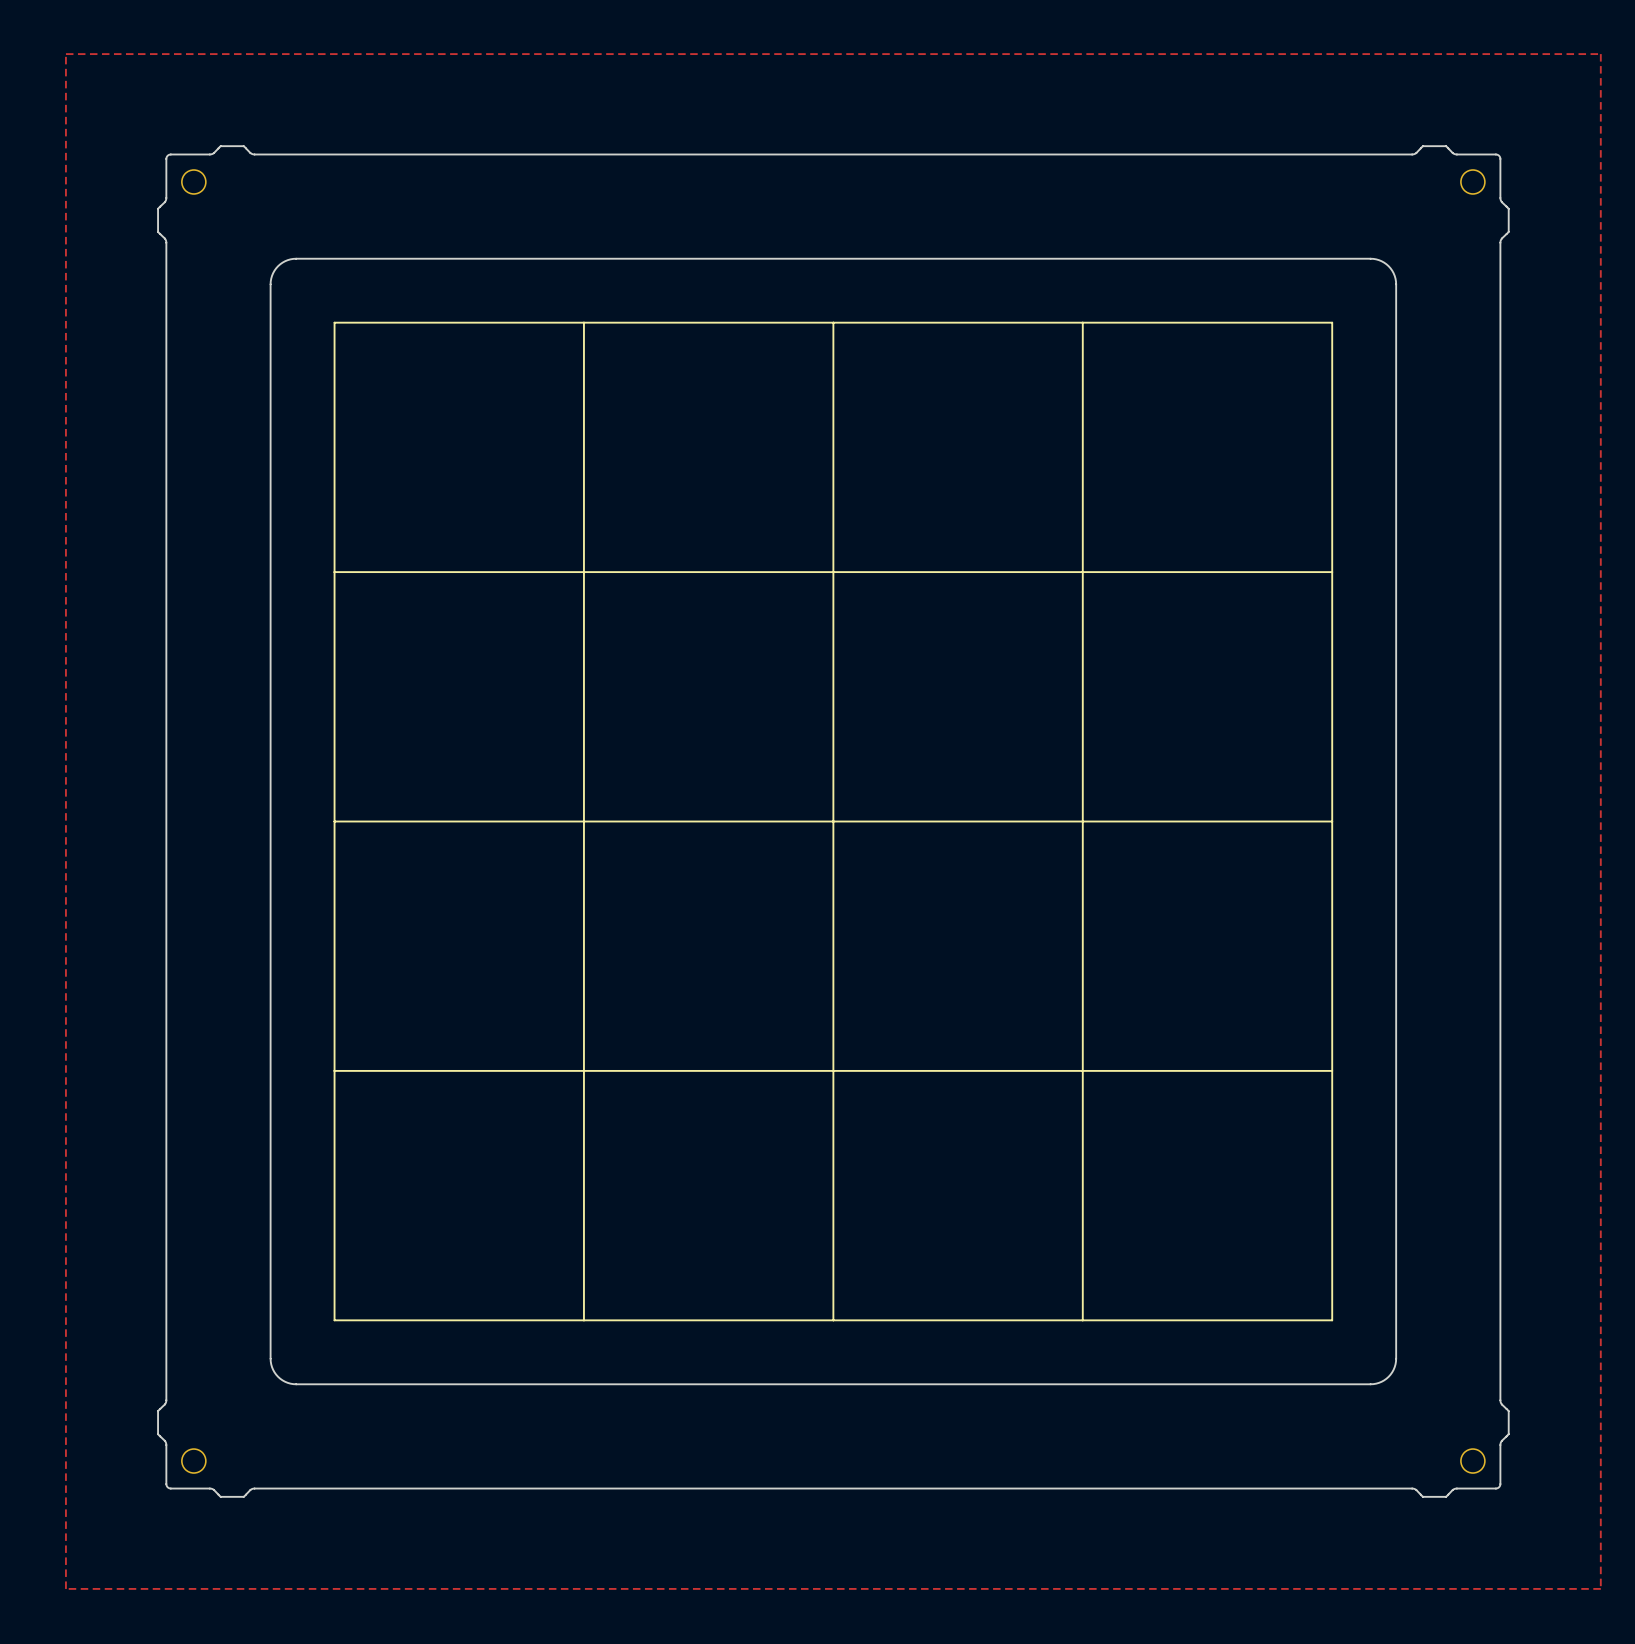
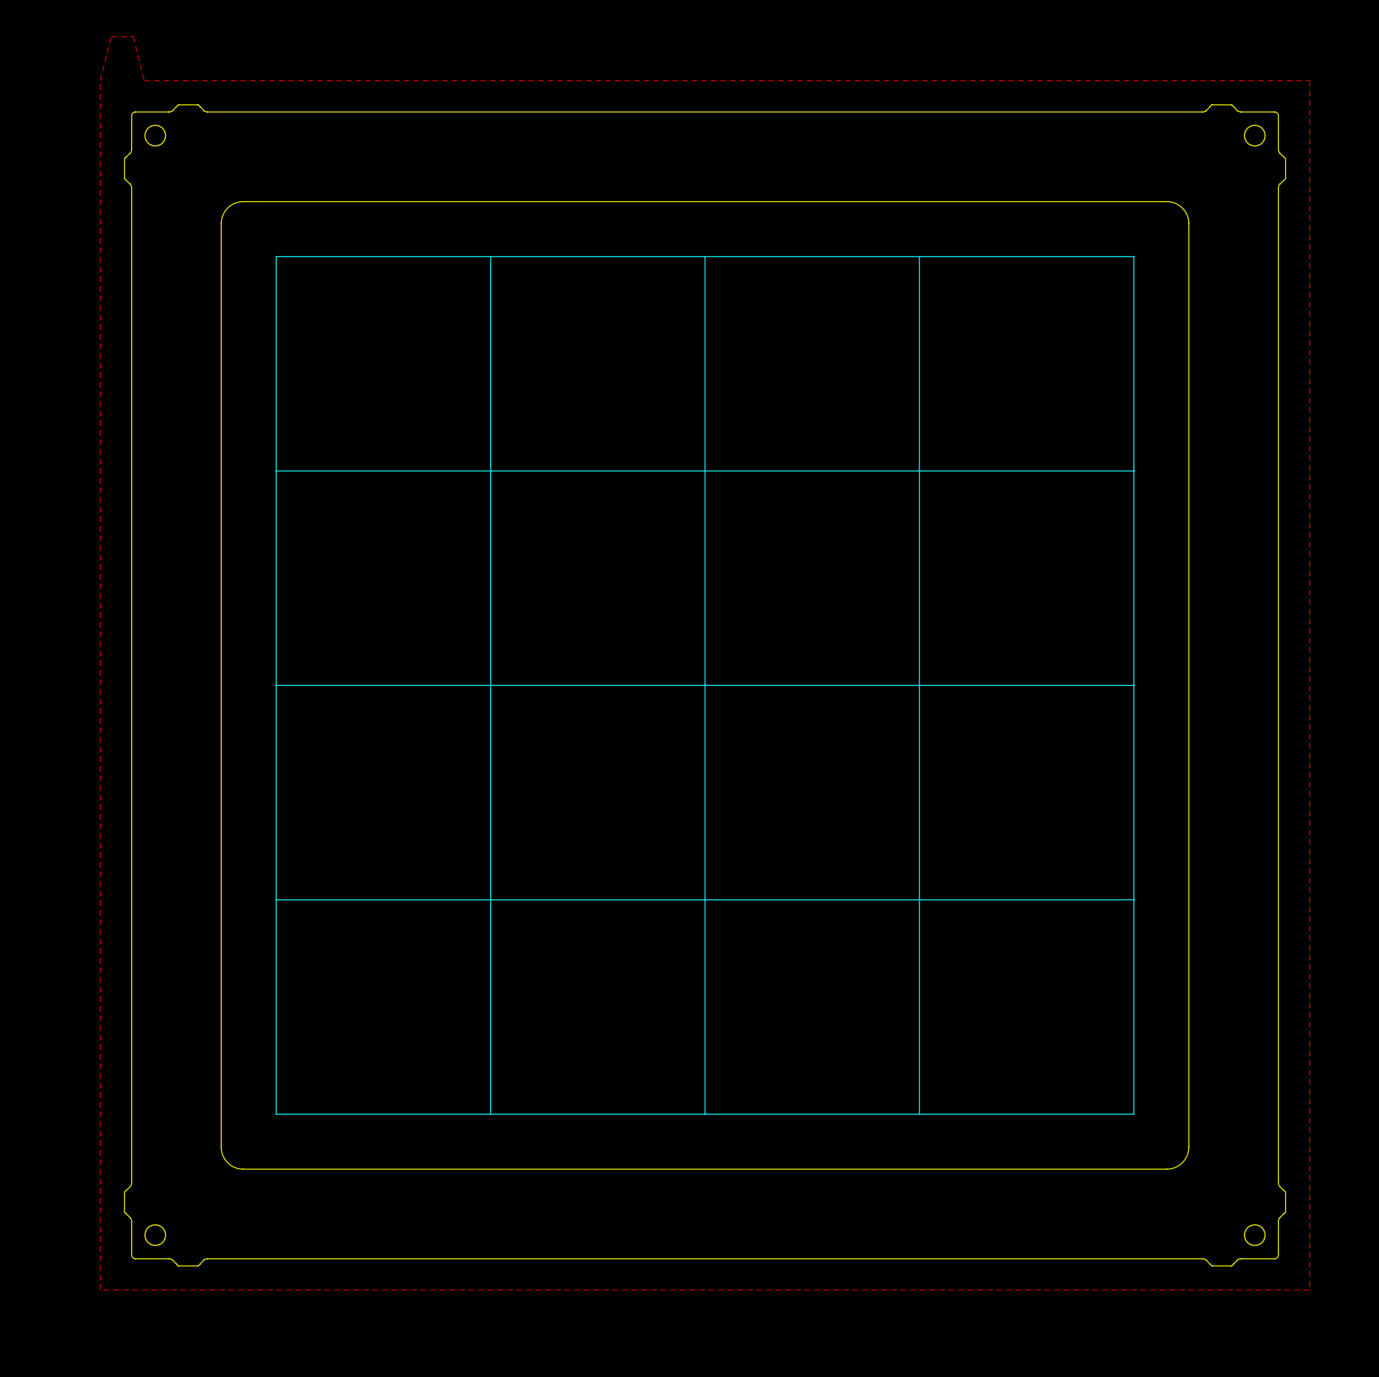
zone outline: (65, 54) (65, 1588) (1600, 1588) (1600, 54) (65, 54) -> (111, 36) (100, 80) (100, 1290) (1309, 1290) (1309, 80) (144, 80) (133, 36) (111, 36)

